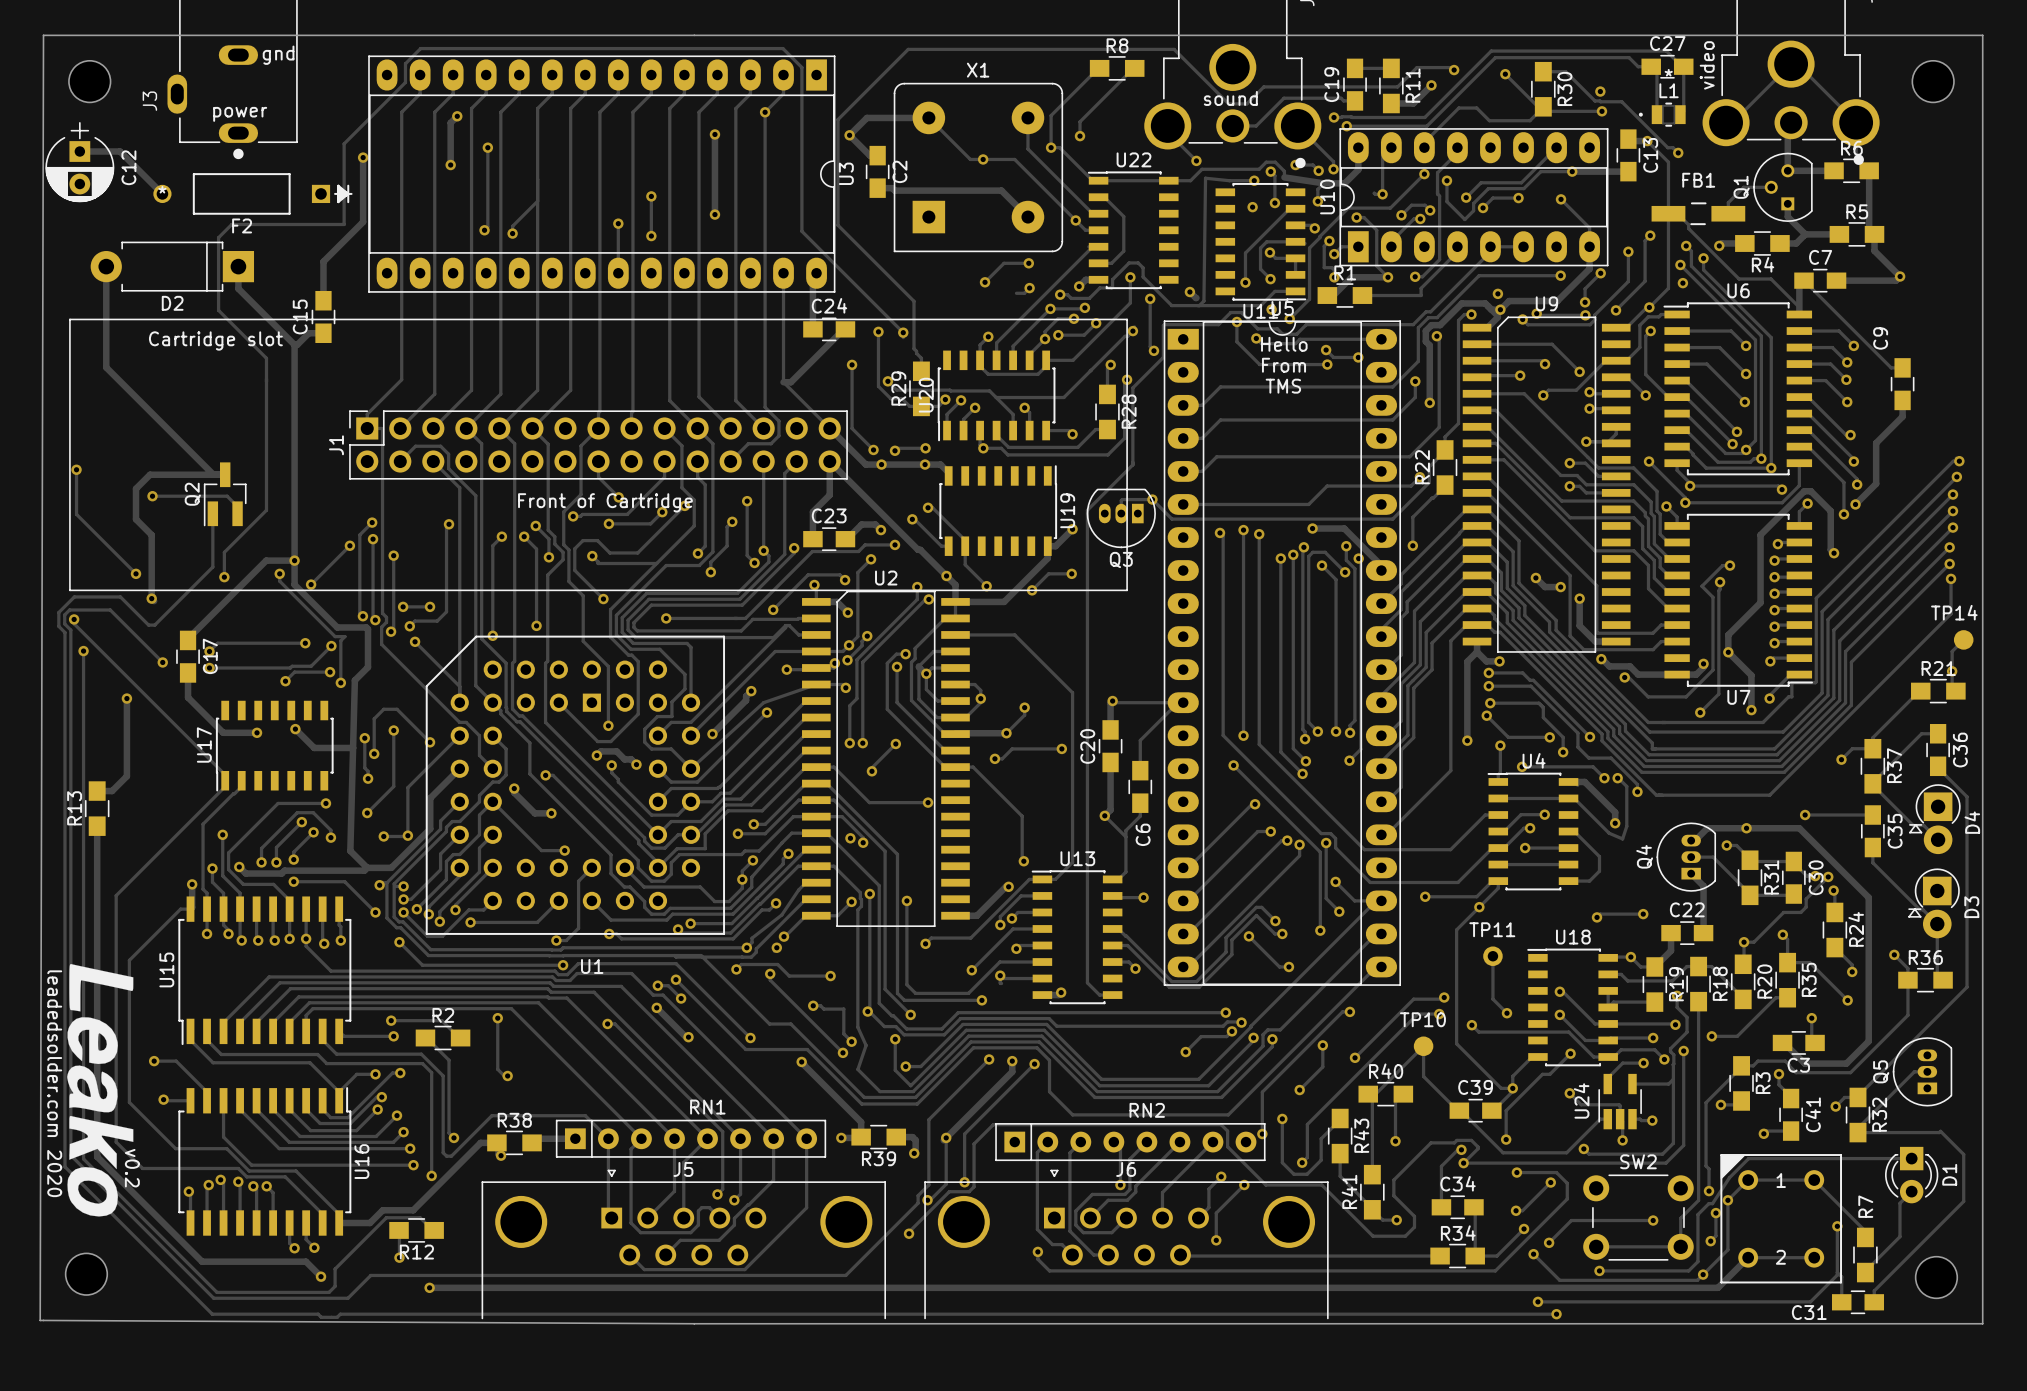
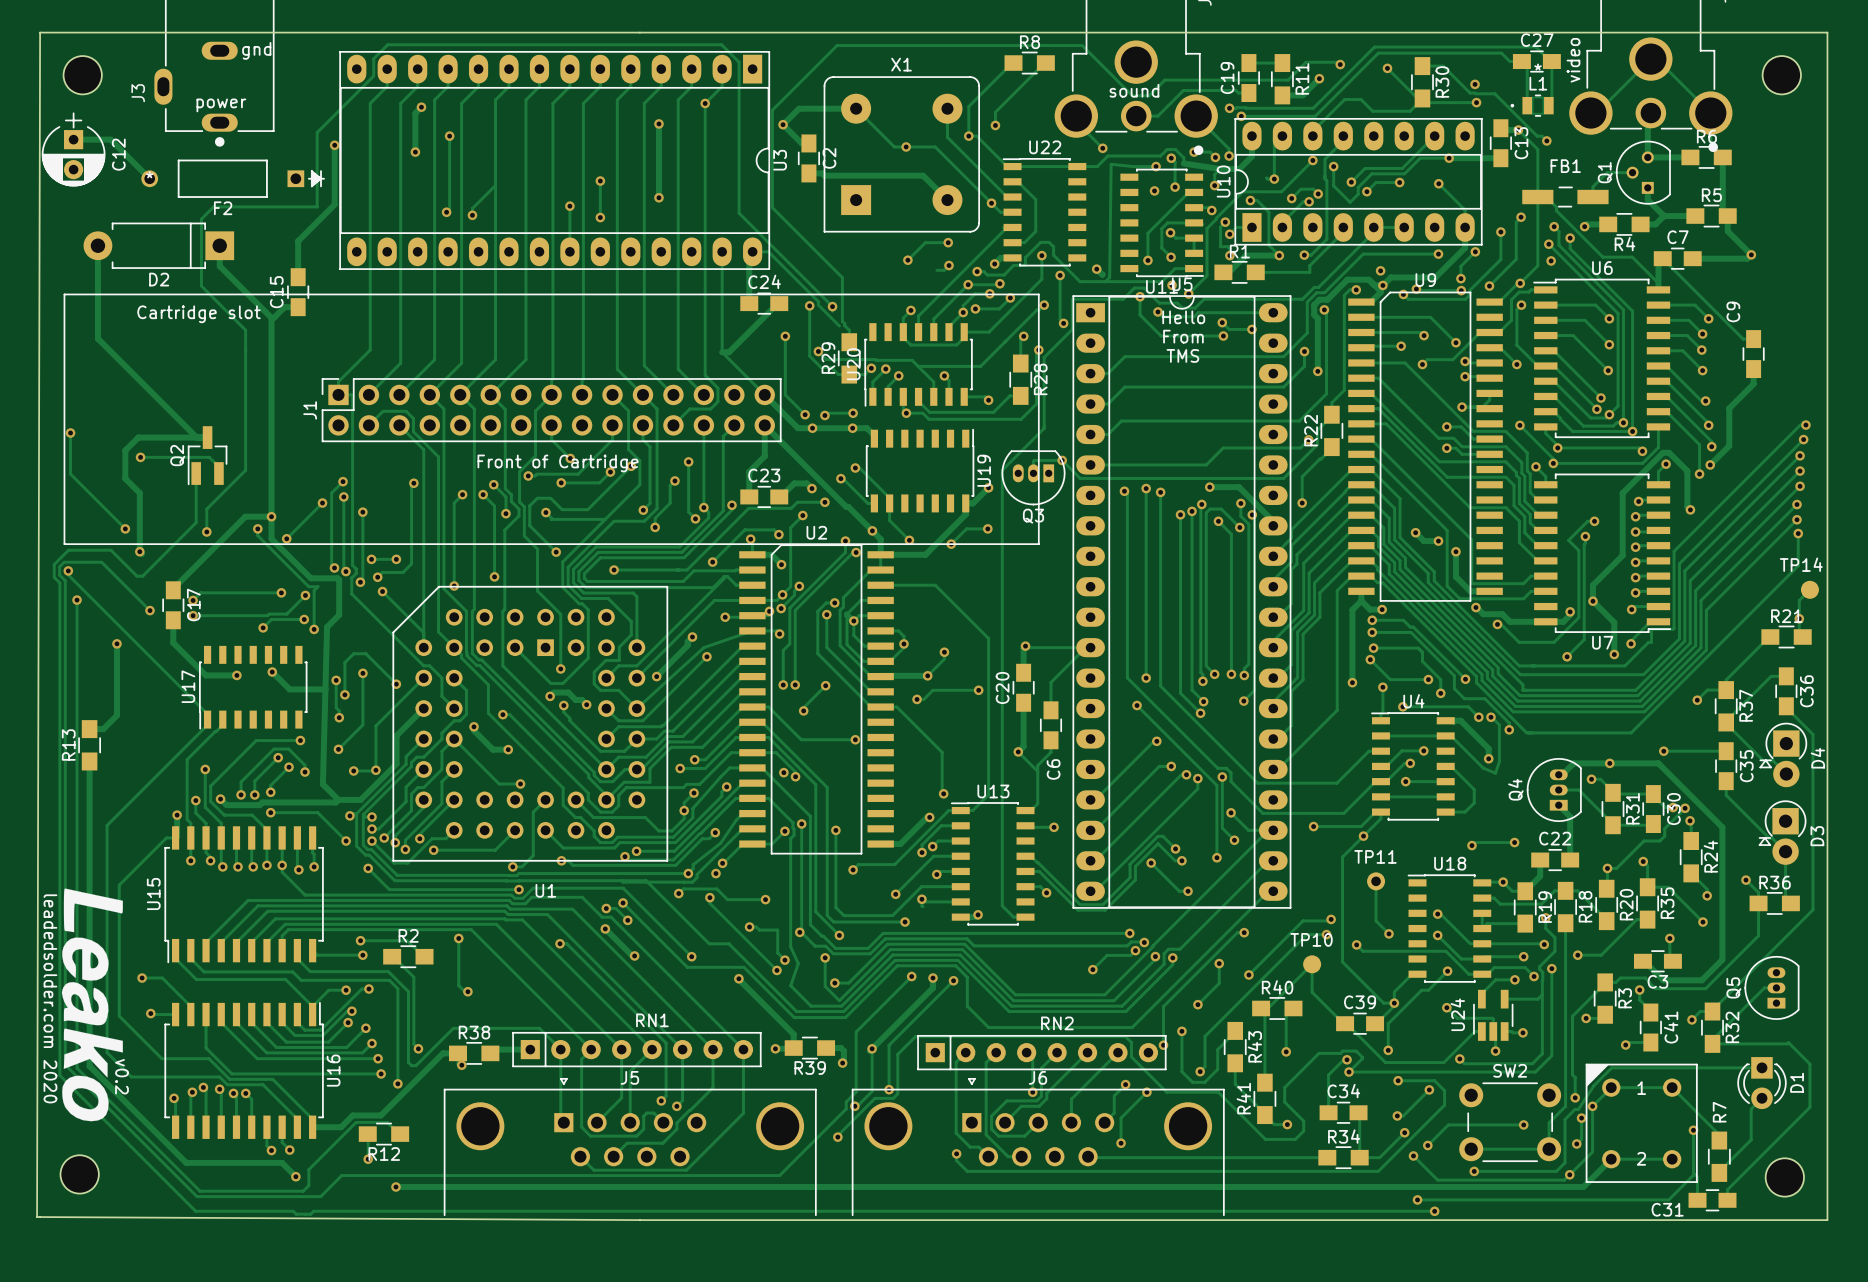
track: none -> (752, 251) (768, 251) (818, 301) (818, 305) (839, 326)

